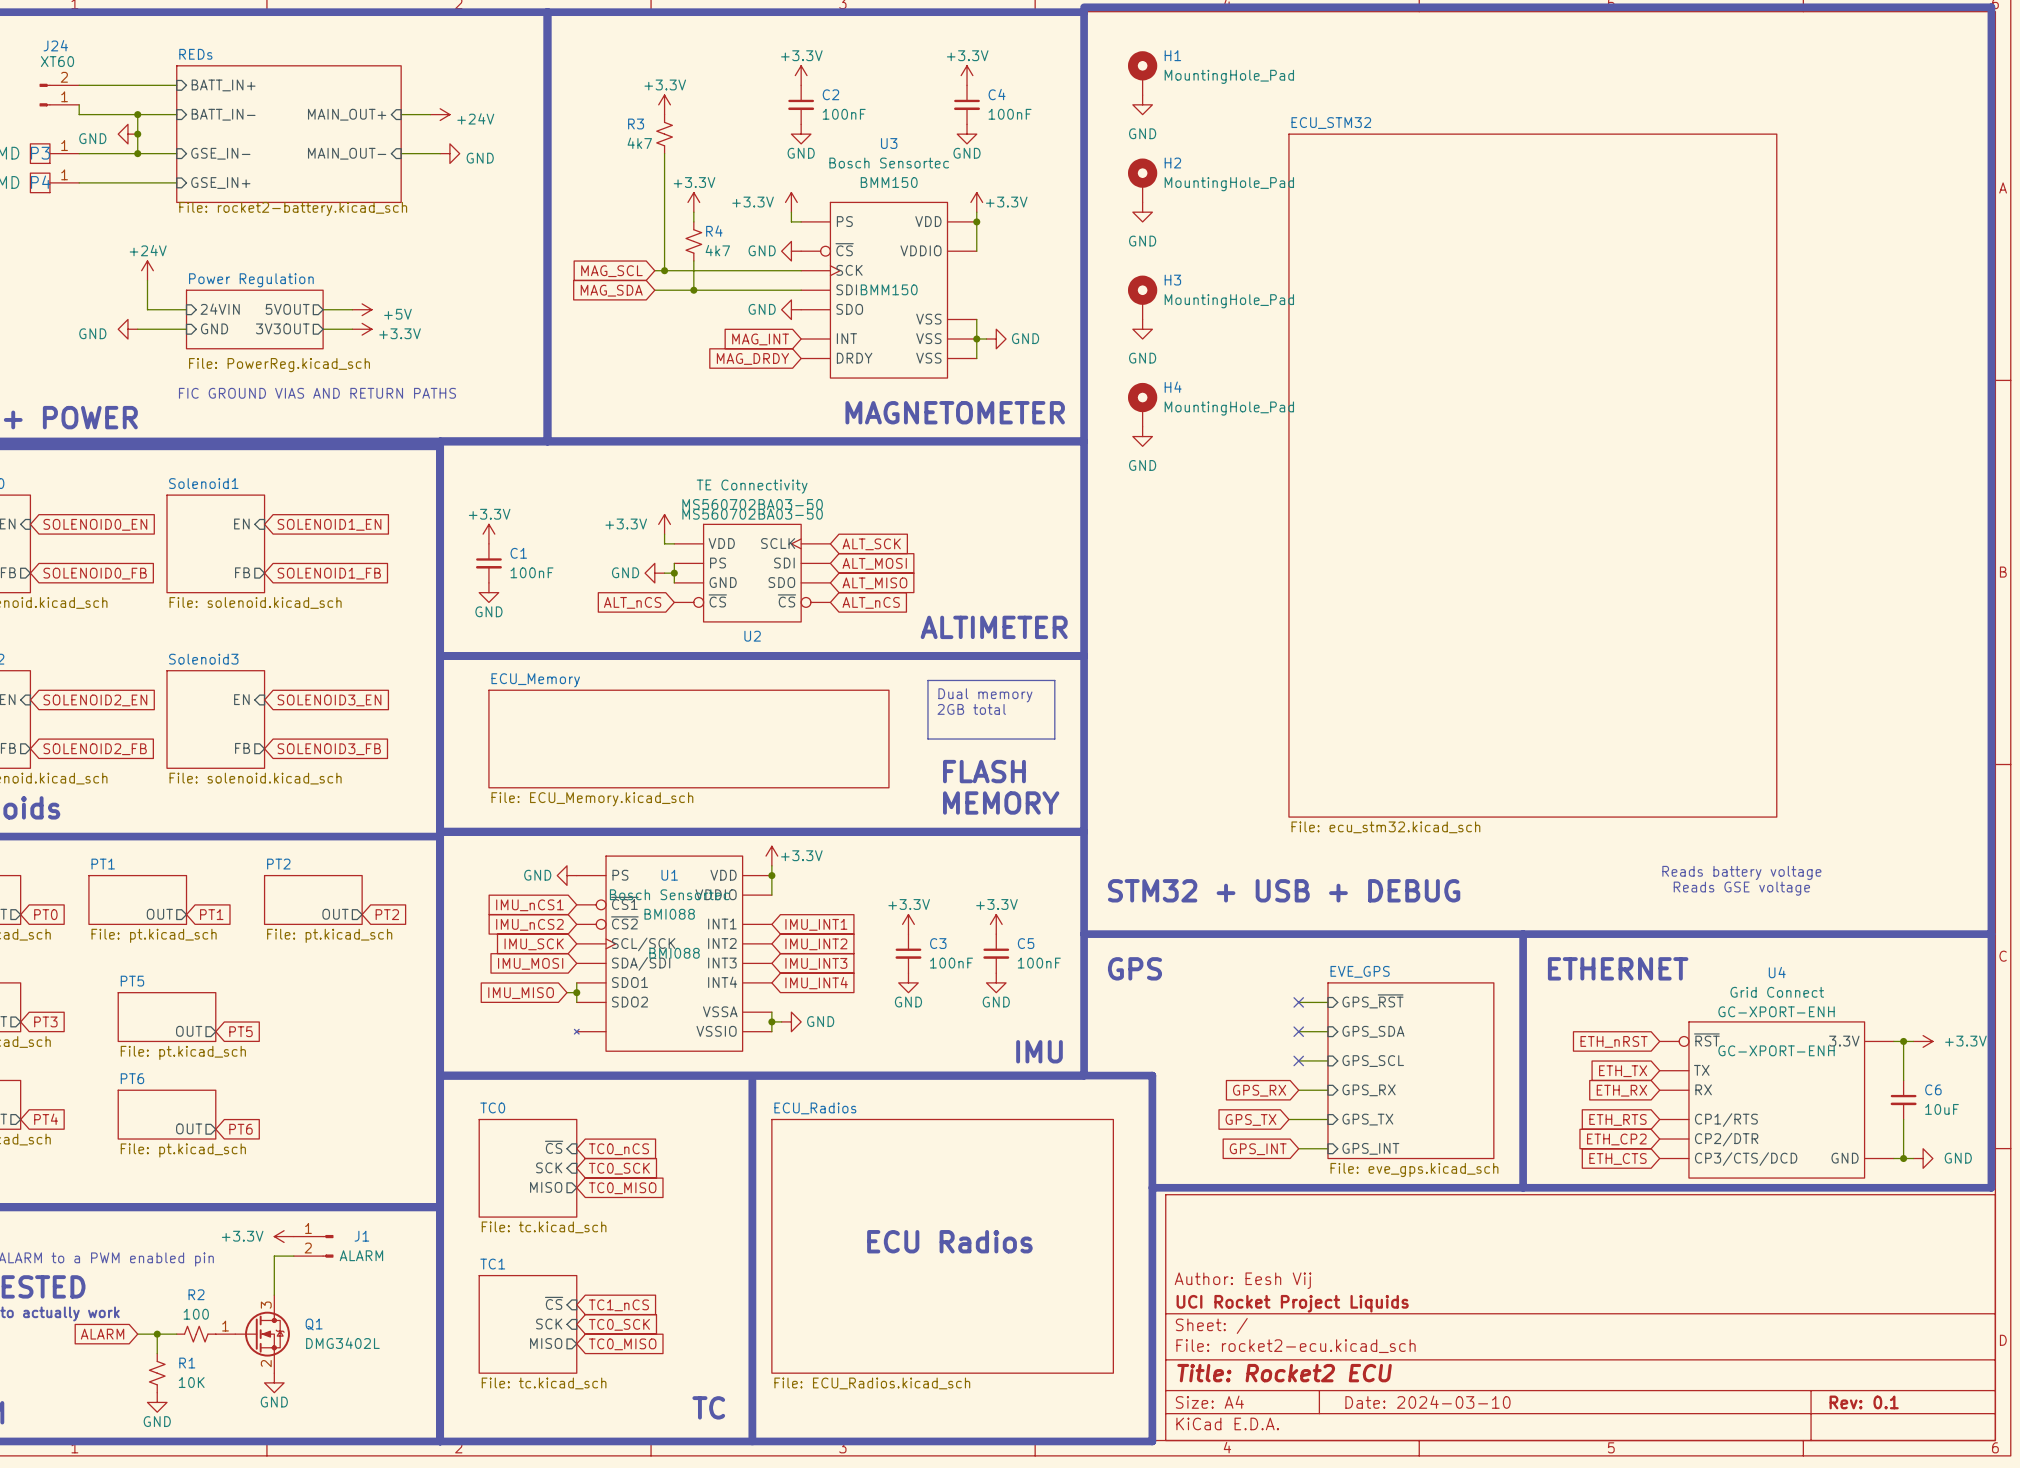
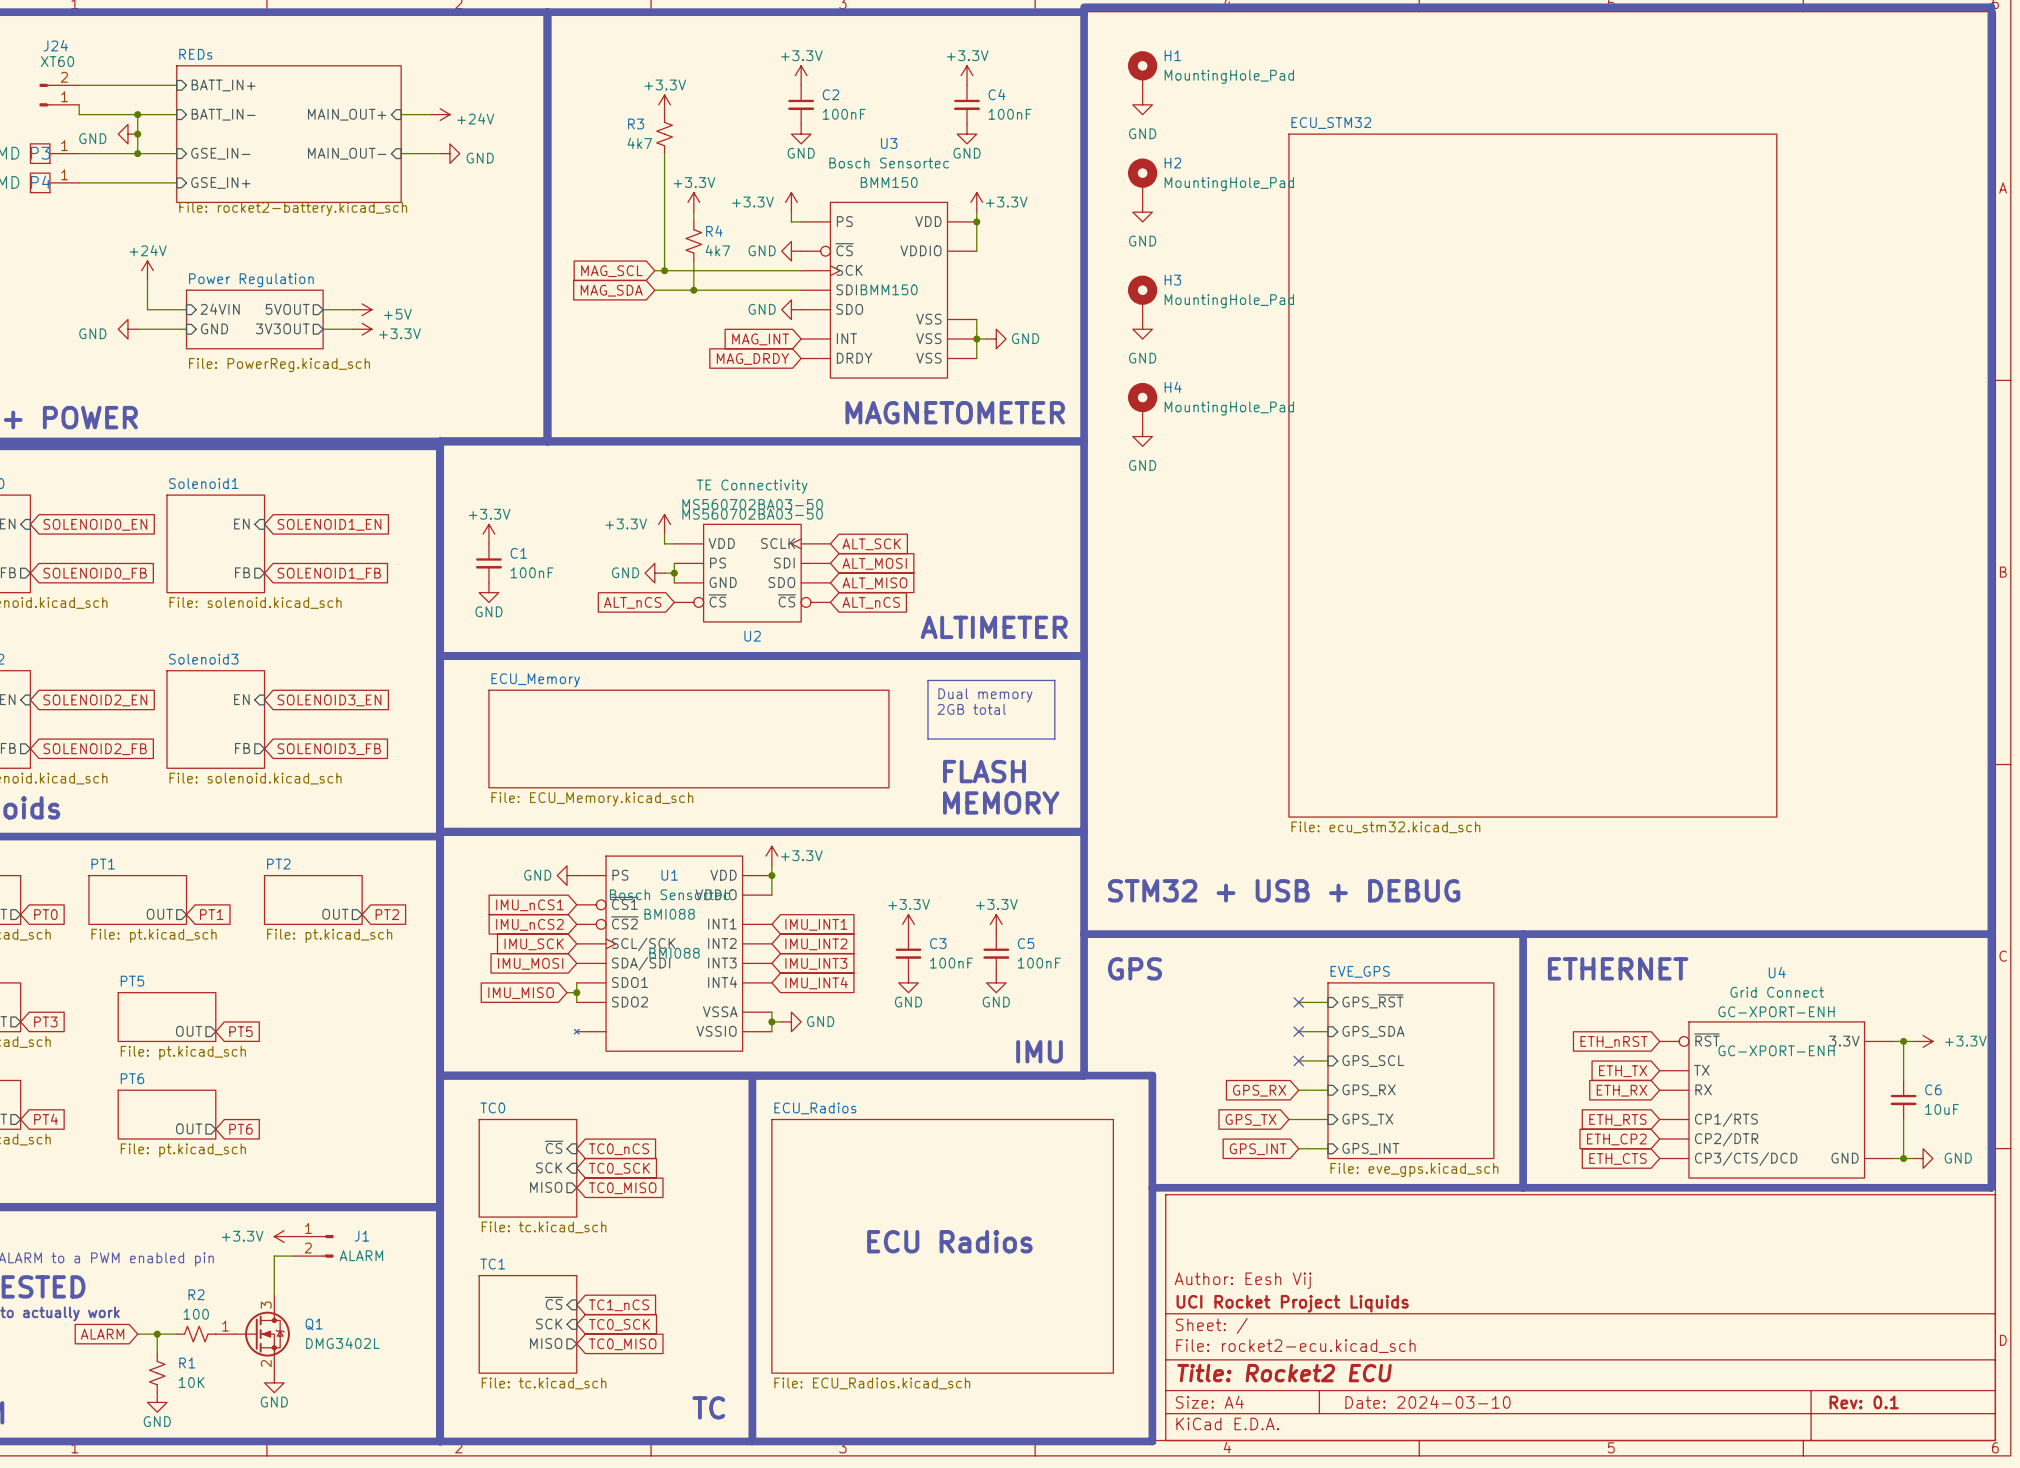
text: FIC GROUND VIAS AND RETURN PATHS (317, 393) -> none
text: Reads battery voltage (1741, 872) -> none
text: Reads GSE voltage (1741, 888) -> none

